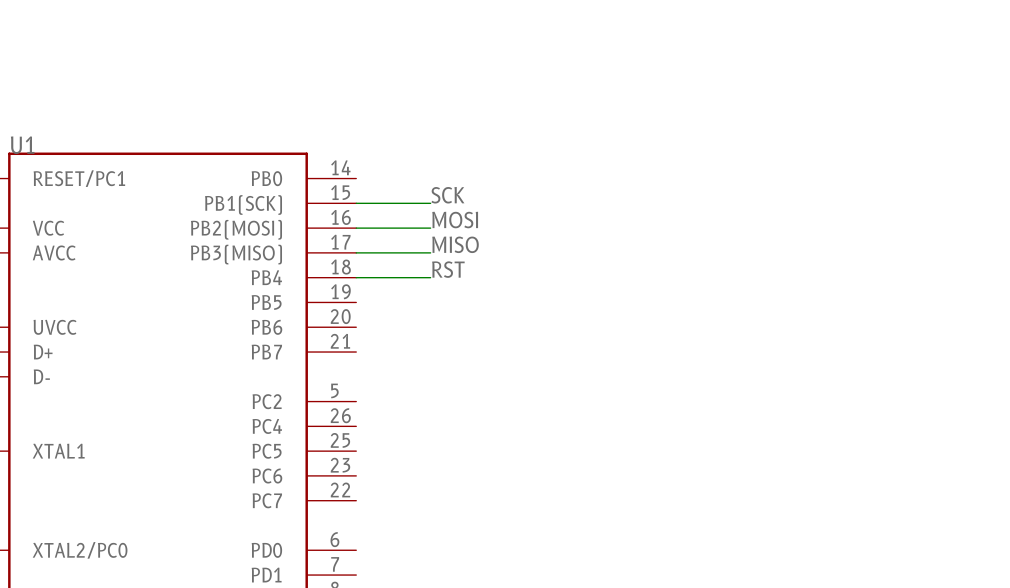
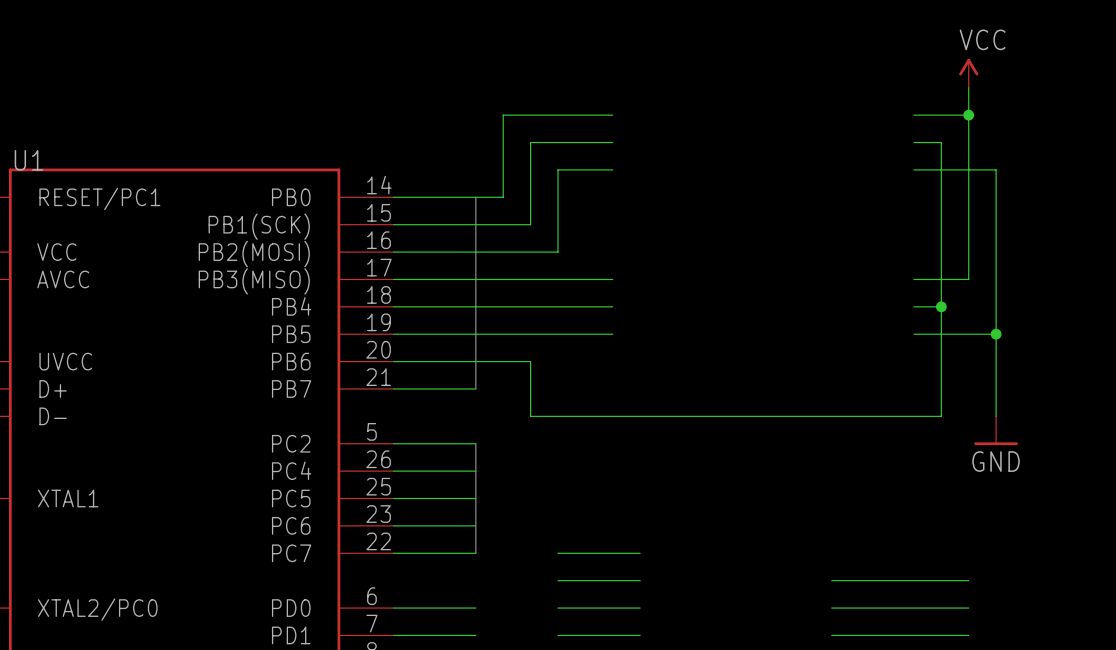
power symbol: none -> VCC (968, 73)
wire: none -> (968, 87) (968, 279) (913, 279)
wire: none -> (612, 115) (503, 115) (503, 197) (393, 197)
wire: none -> (913, 115) (968, 115)
junction: none -> (968, 115)
wire: none -> (612, 142) (530, 142) (530, 224) (475, 224)
wire: none -> (913, 142) (941, 142) (941, 416) (530, 416) (530, 361) (393, 361)
wire: none -> (612, 169) (557, 169) (557, 252) (475, 252)
wire: none -> (913, 169) (996, 169) (996, 416)
bus: none -> (475, 197) (475, 388)
label: SCK (447, 195) -> none
label: MOSI (455, 220) -> none
label: MISO (455, 244) -> none
wire: none -> (475, 279) (612, 279)
label: RST (448, 269) -> none
wire: none -> (475, 306) (612, 306)
wire: none -> (913, 306) (941, 306)
junction: none -> (941, 306)
wire: none -> (393, 334) (612, 334)
wire: none -> (913, 334) (996, 334)
junction: none -> (996, 334)
wire: none -> (393, 388) (475, 388)
power symbol: none -> GND (996, 430)
wire: none -> (393, 443) (475, 443)
bus: none -> (475, 443) (475, 553)
wire: none -> (393, 471) (475, 471)
wire: none -> (393, 498) (475, 498)
wire: none -> (393, 525) (475, 525)
wire: none -> (393, 553) (475, 553)
wire: none -> (557, 553) (640, 553)
wire: none -> (557, 580) (640, 580)
wire: none -> (831, 580) (968, 580)
wire: none -> (393, 608) (475, 608)
wire: none -> (557, 608) (640, 608)
wire: none -> (831, 608) (968, 608)
wire: none -> (393, 635) (475, 635)
wire: none -> (557, 635) (640, 635)
wire: none -> (831, 635) (968, 635)

